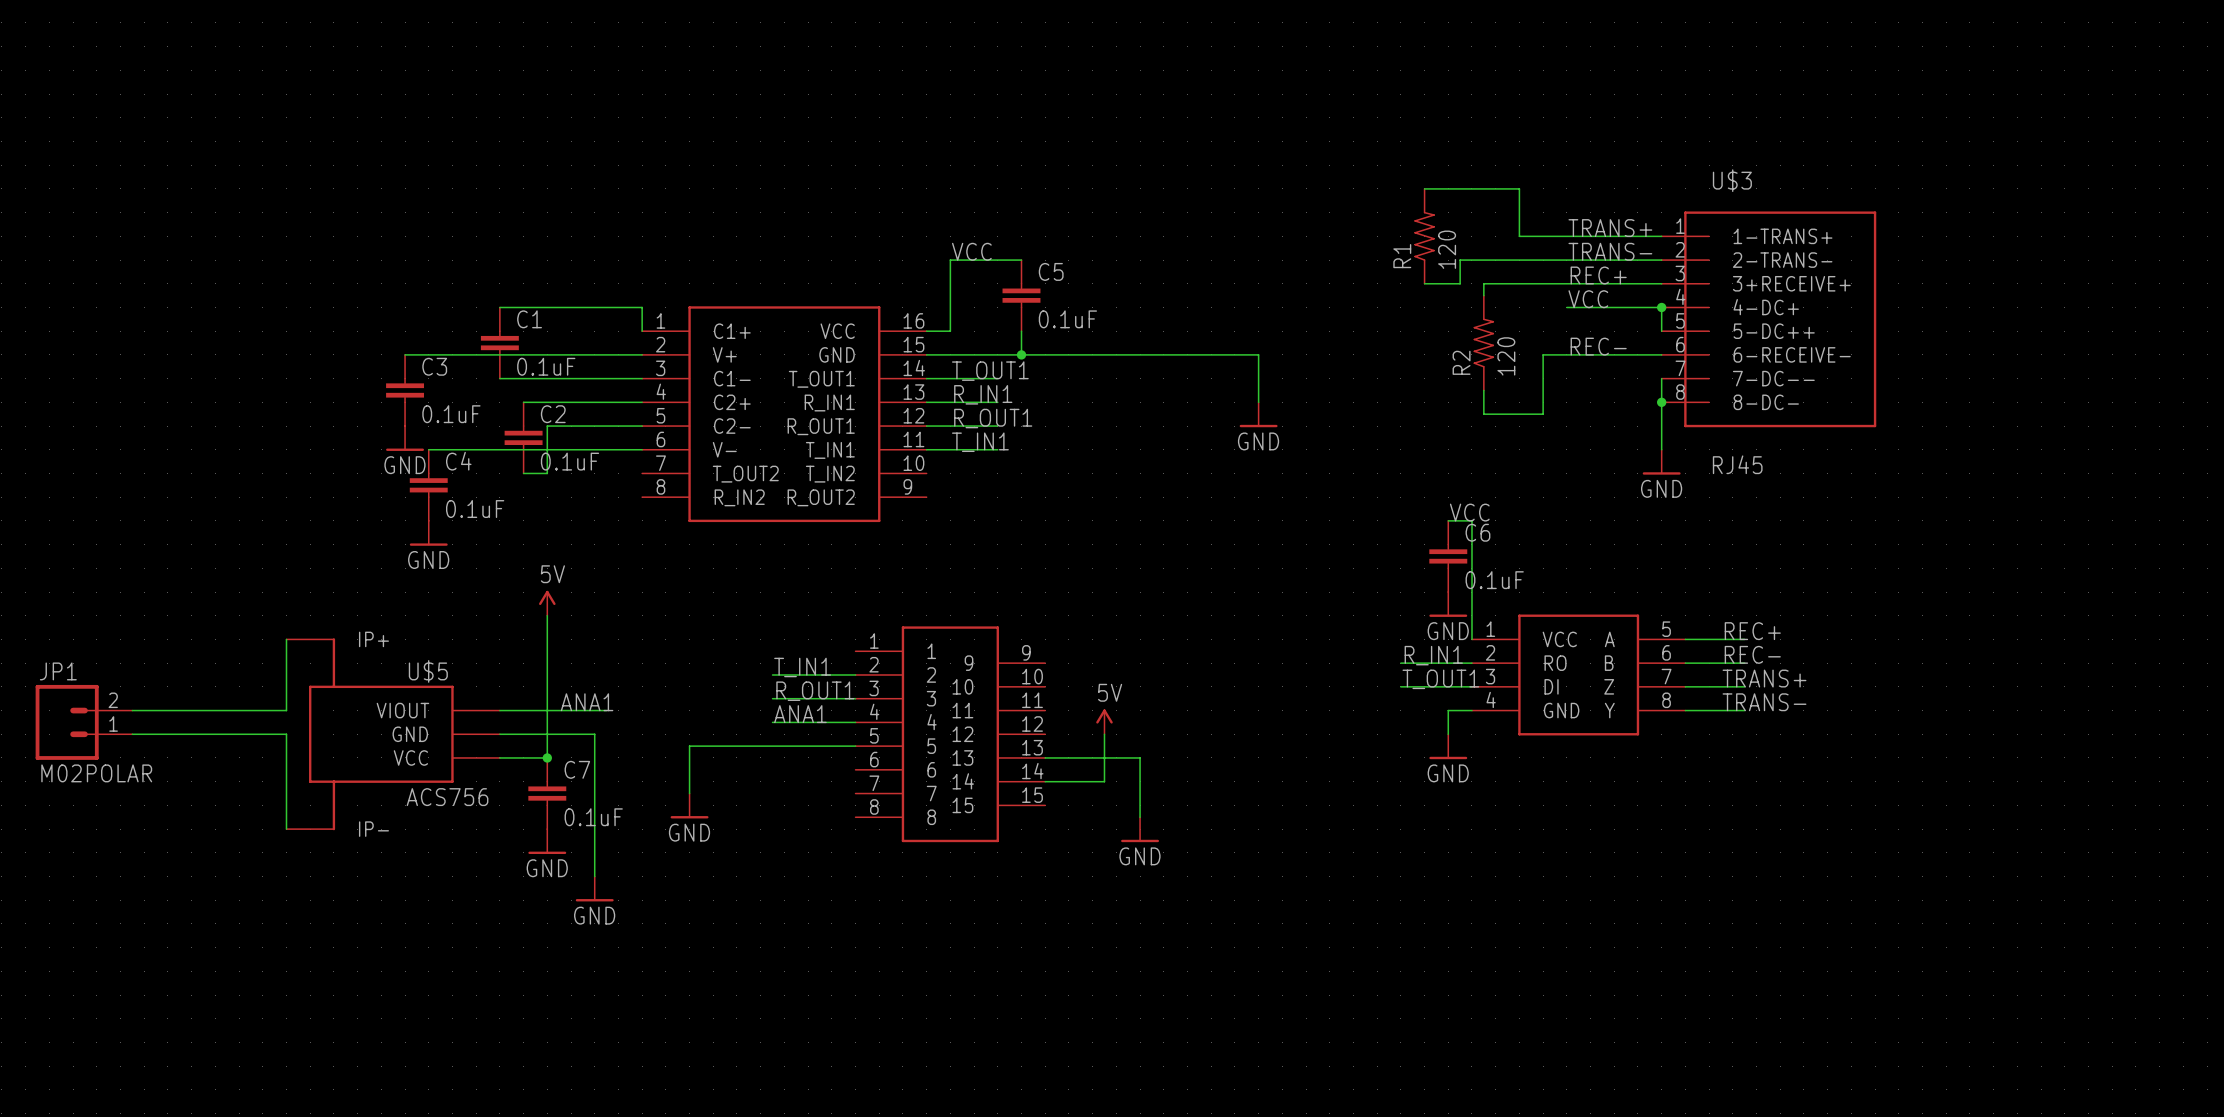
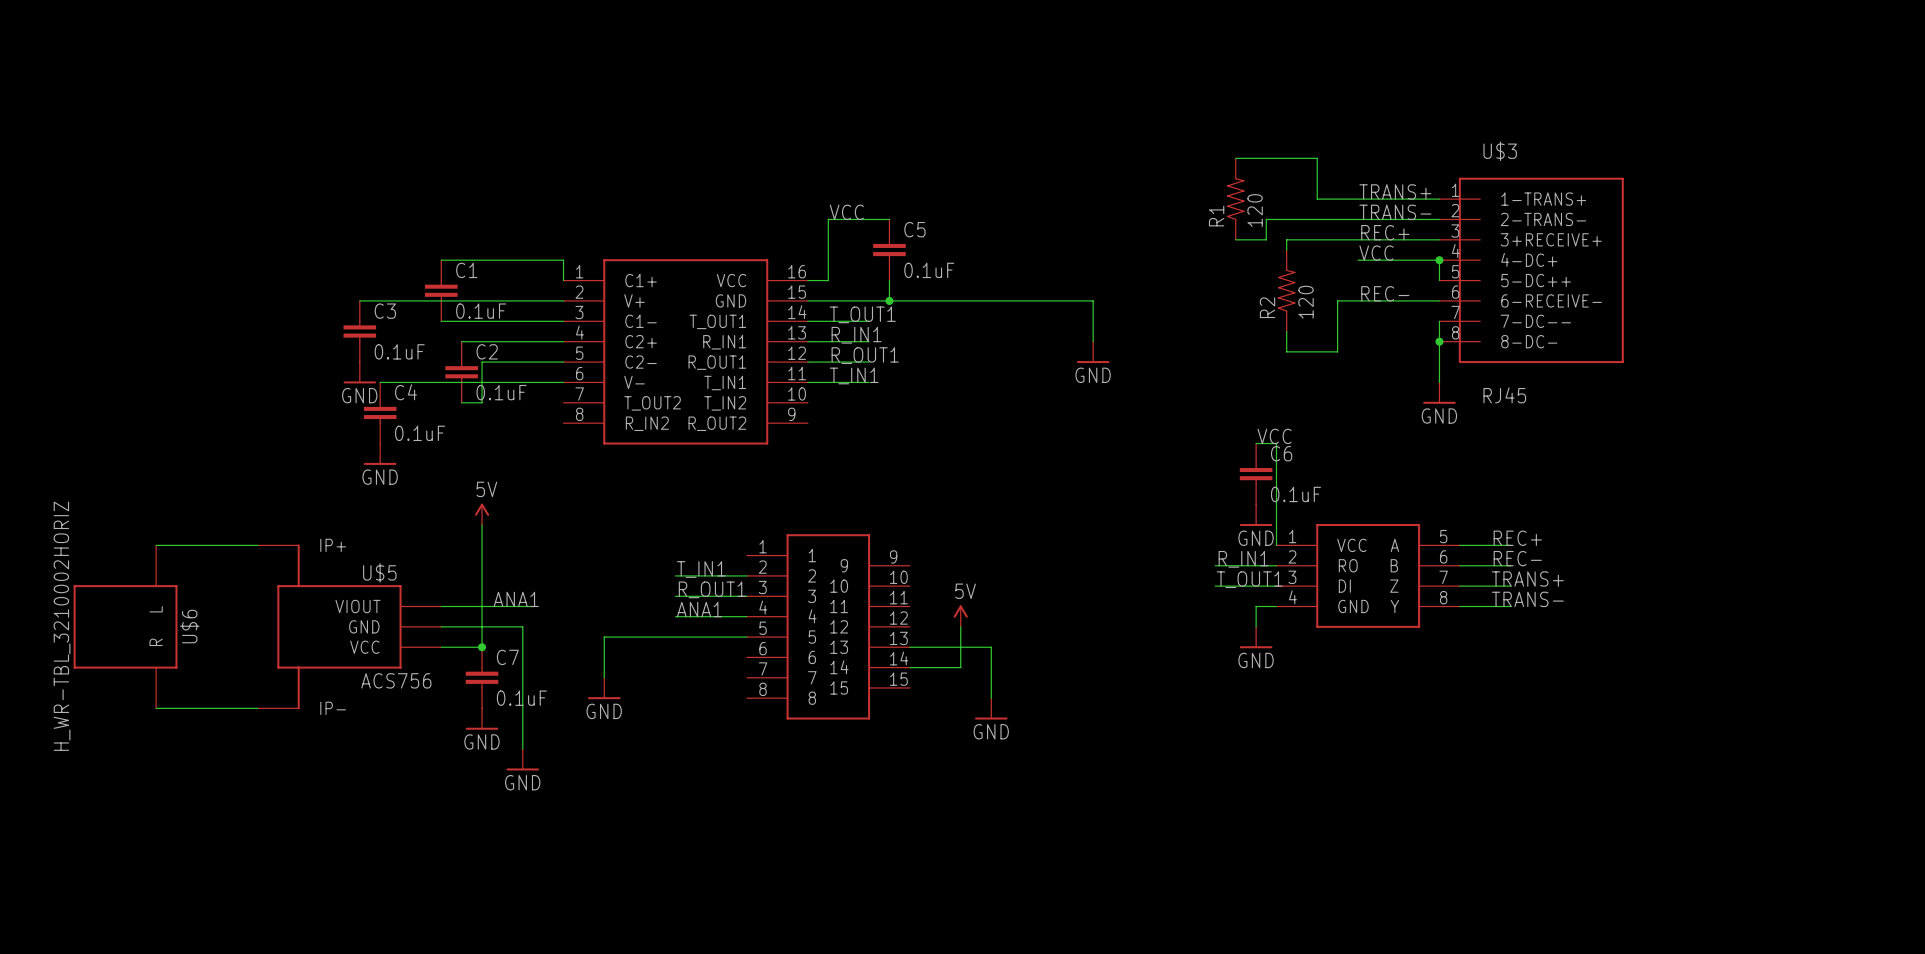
wire: (286, 639) (286, 710) (132, 710) -> (257, 545) (156, 545)
JP1: M02POLAR (84, 722) -> none
wire: (132, 734) (286, 734) (286, 829) -> (156, 708) (257, 708)
U$6: none -> H_WR-TBL_3210002HORIZ (125, 626)

